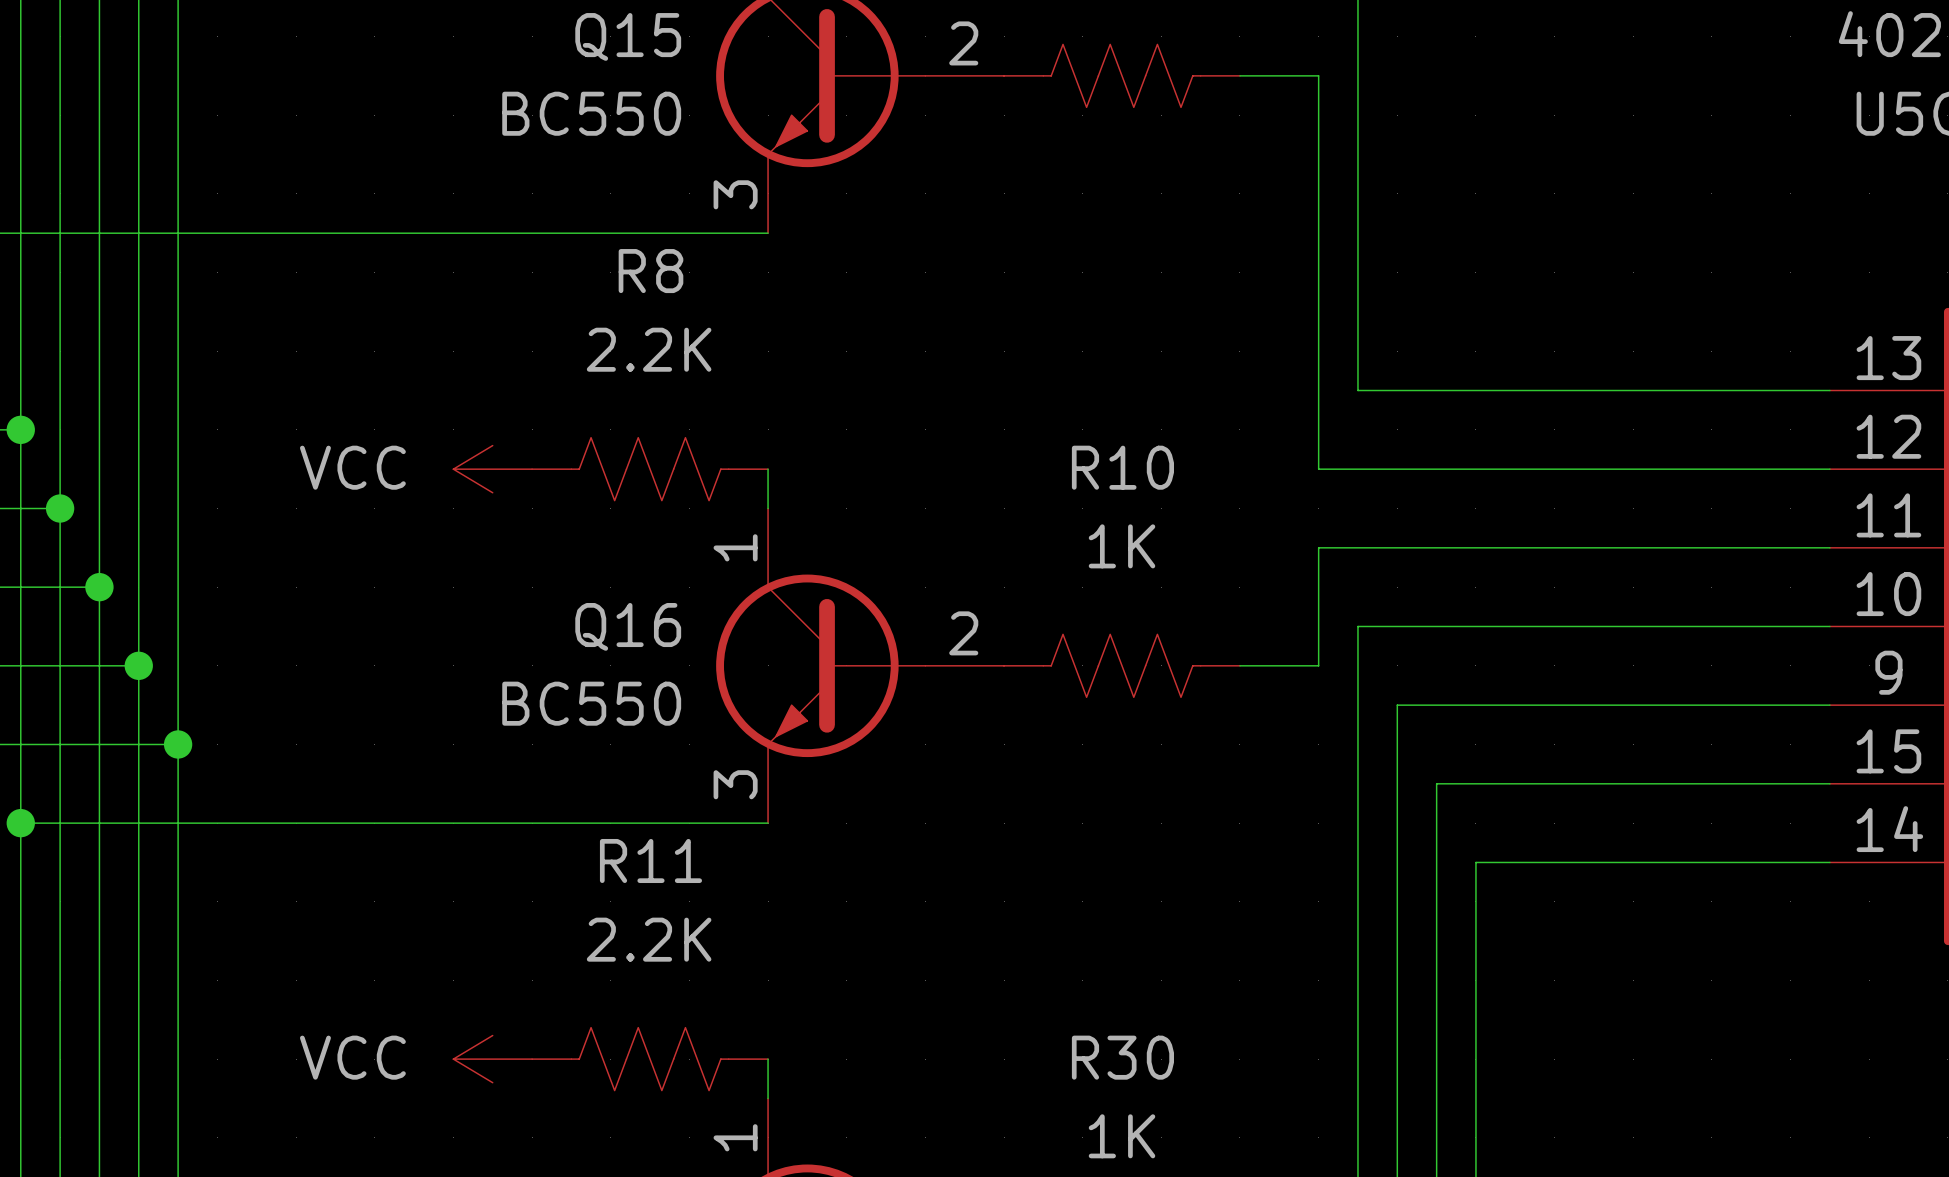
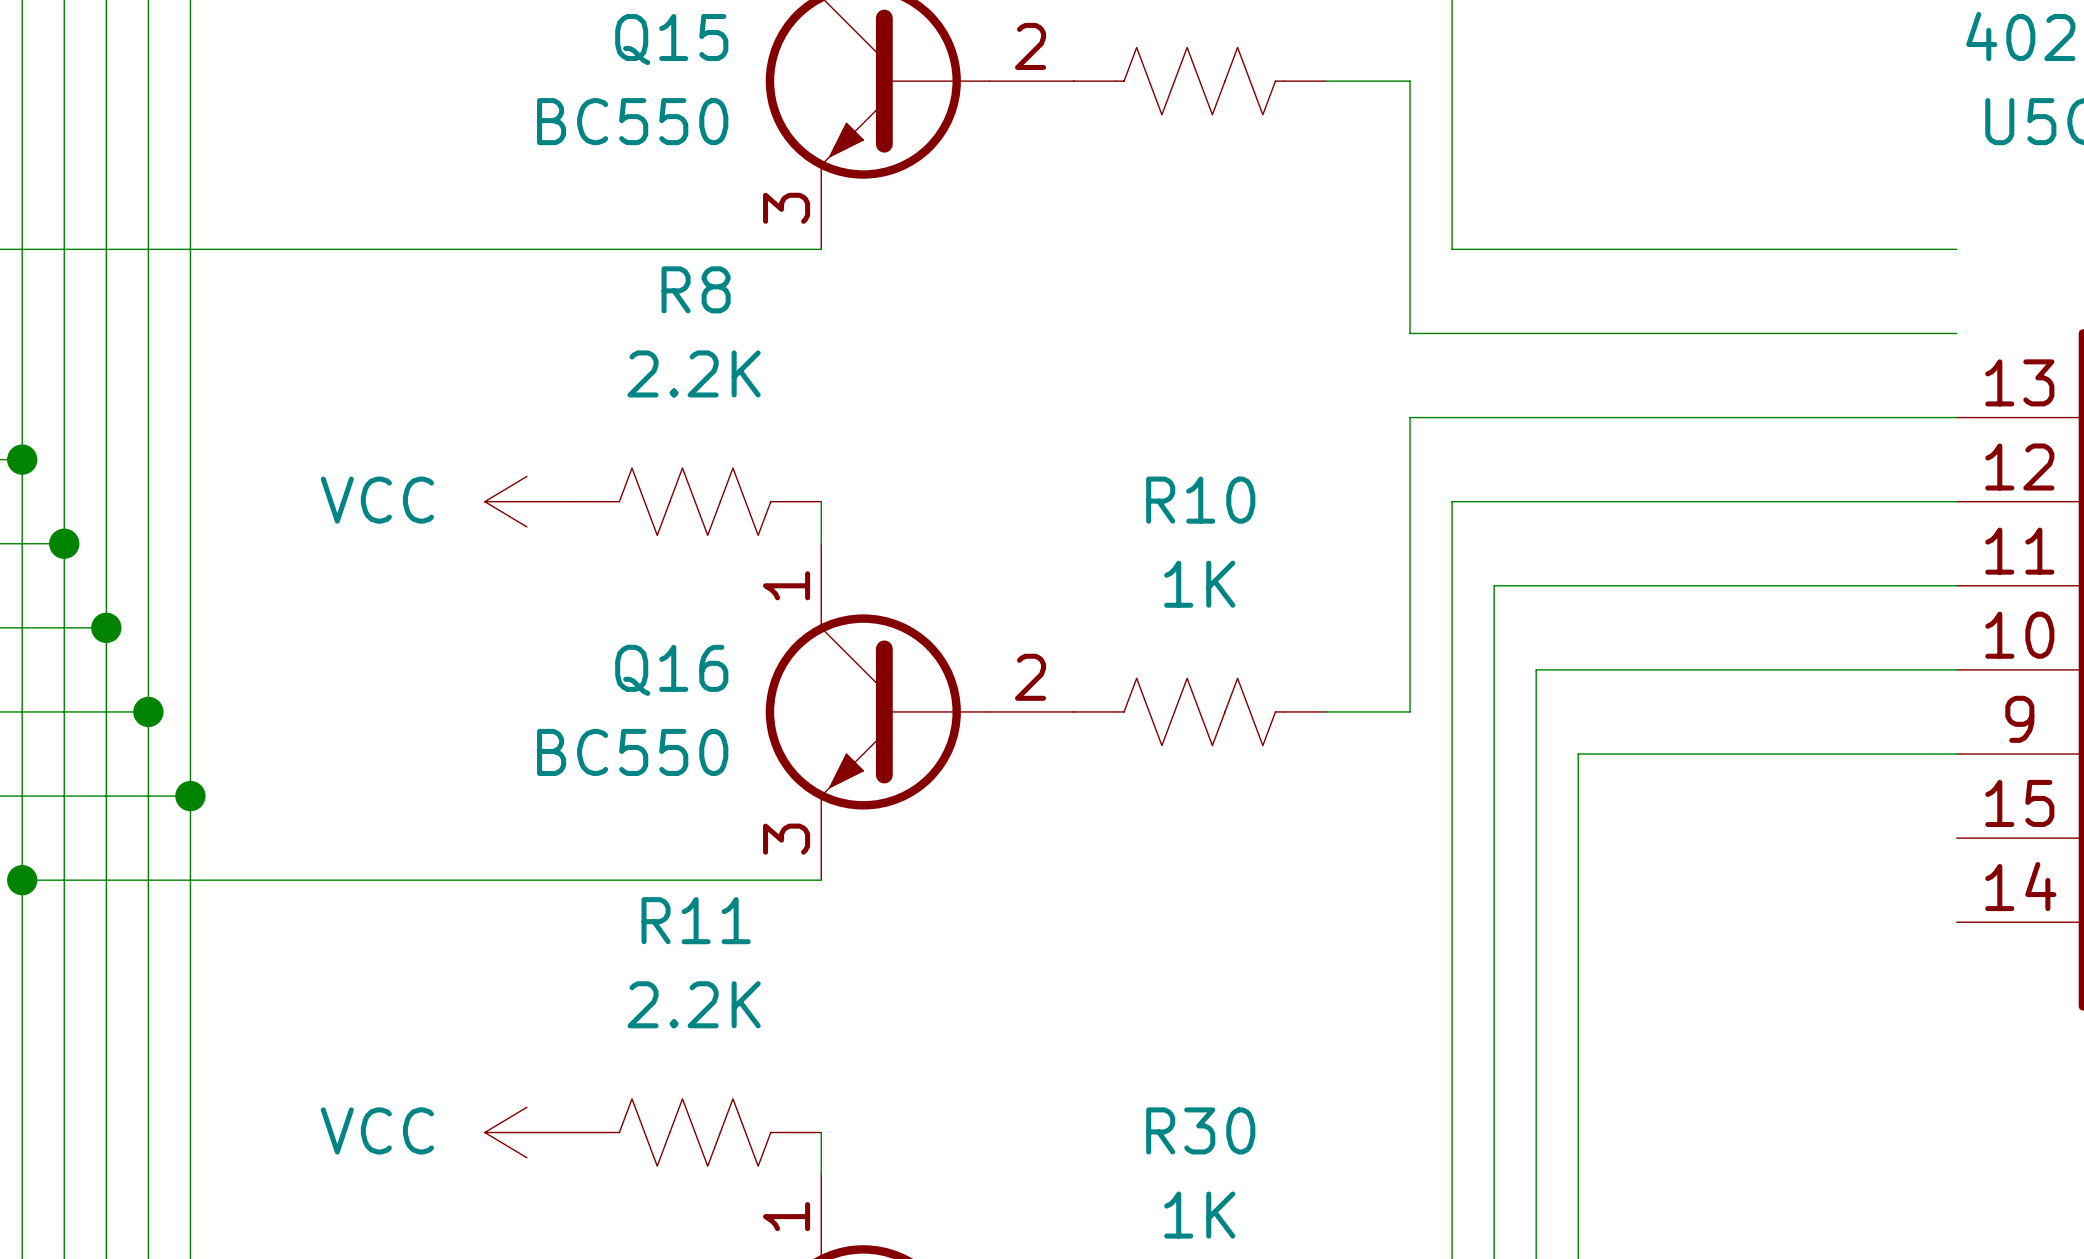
wire: (1357, 233) (1357, 390) -> (1452, 249) (1956, 249)
wire: (1318, 311) (1318, 390) -> (1452, 417) (1410, 417)
wire: none -> (1410, 333) (1956, 333)
wire: (1318, 469) (1357, 469) -> (1410, 501) (1410, 585)
wire: (1318, 547) (1397, 547) -> (1494, 754) (1494, 585)
wire: (1357, 626) (1436, 626) -> (1452, 669) (1452, 501)
wire: (1397, 705) (1475, 705) -> (1578, 922) (1578, 754)
wire: (1436, 783) (1829, 783) -> (1536, 838) (1536, 669)
wire: (1475, 862) (1829, 862) -> none

